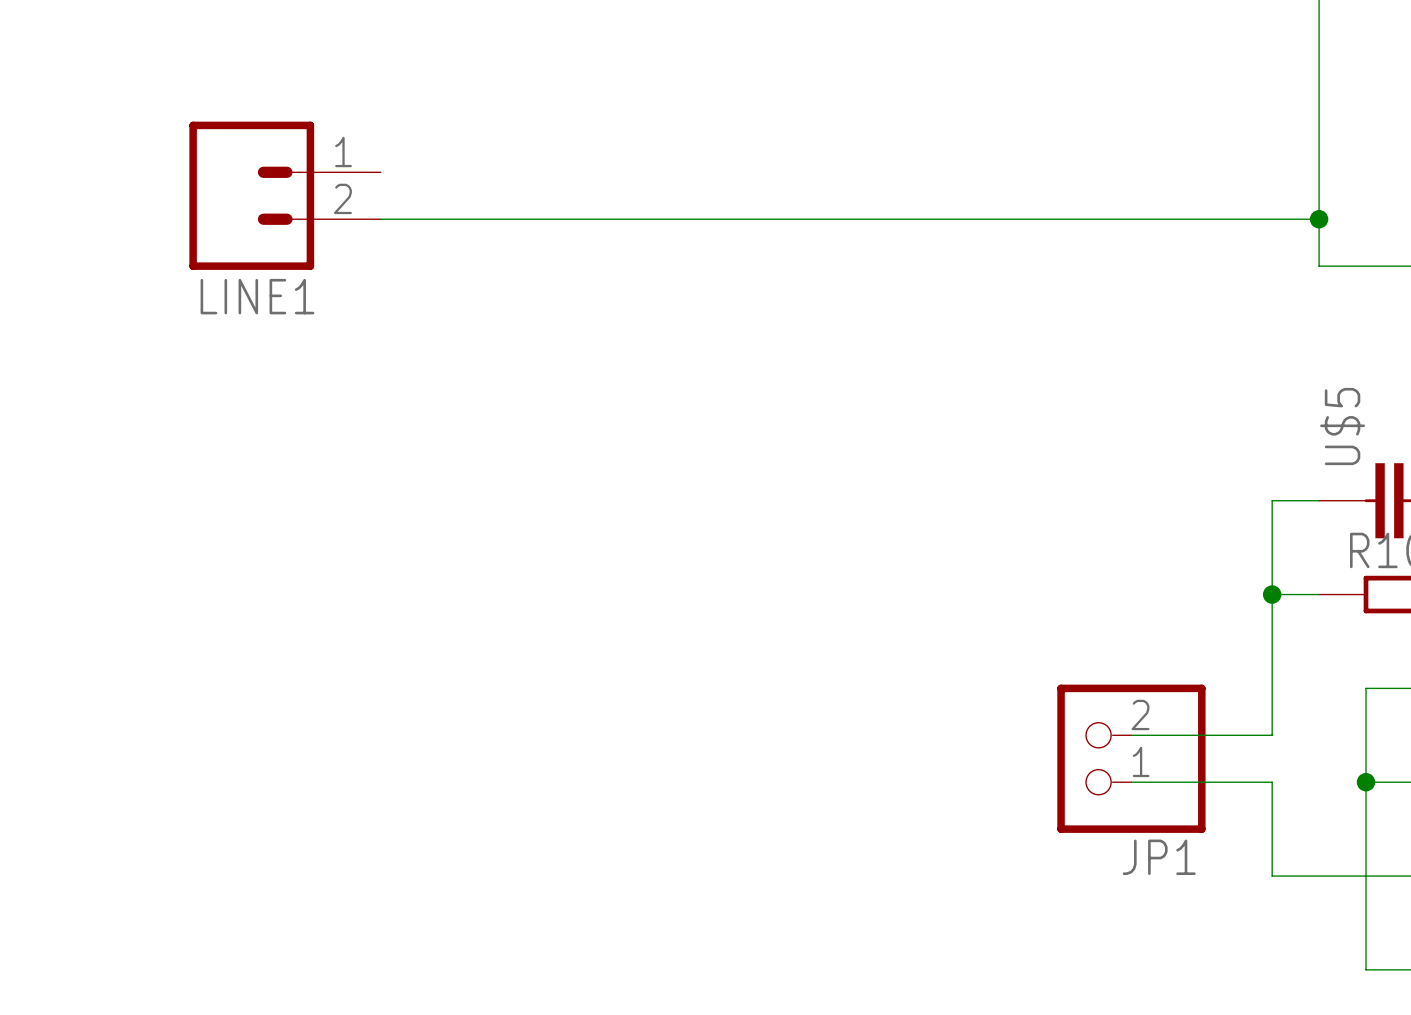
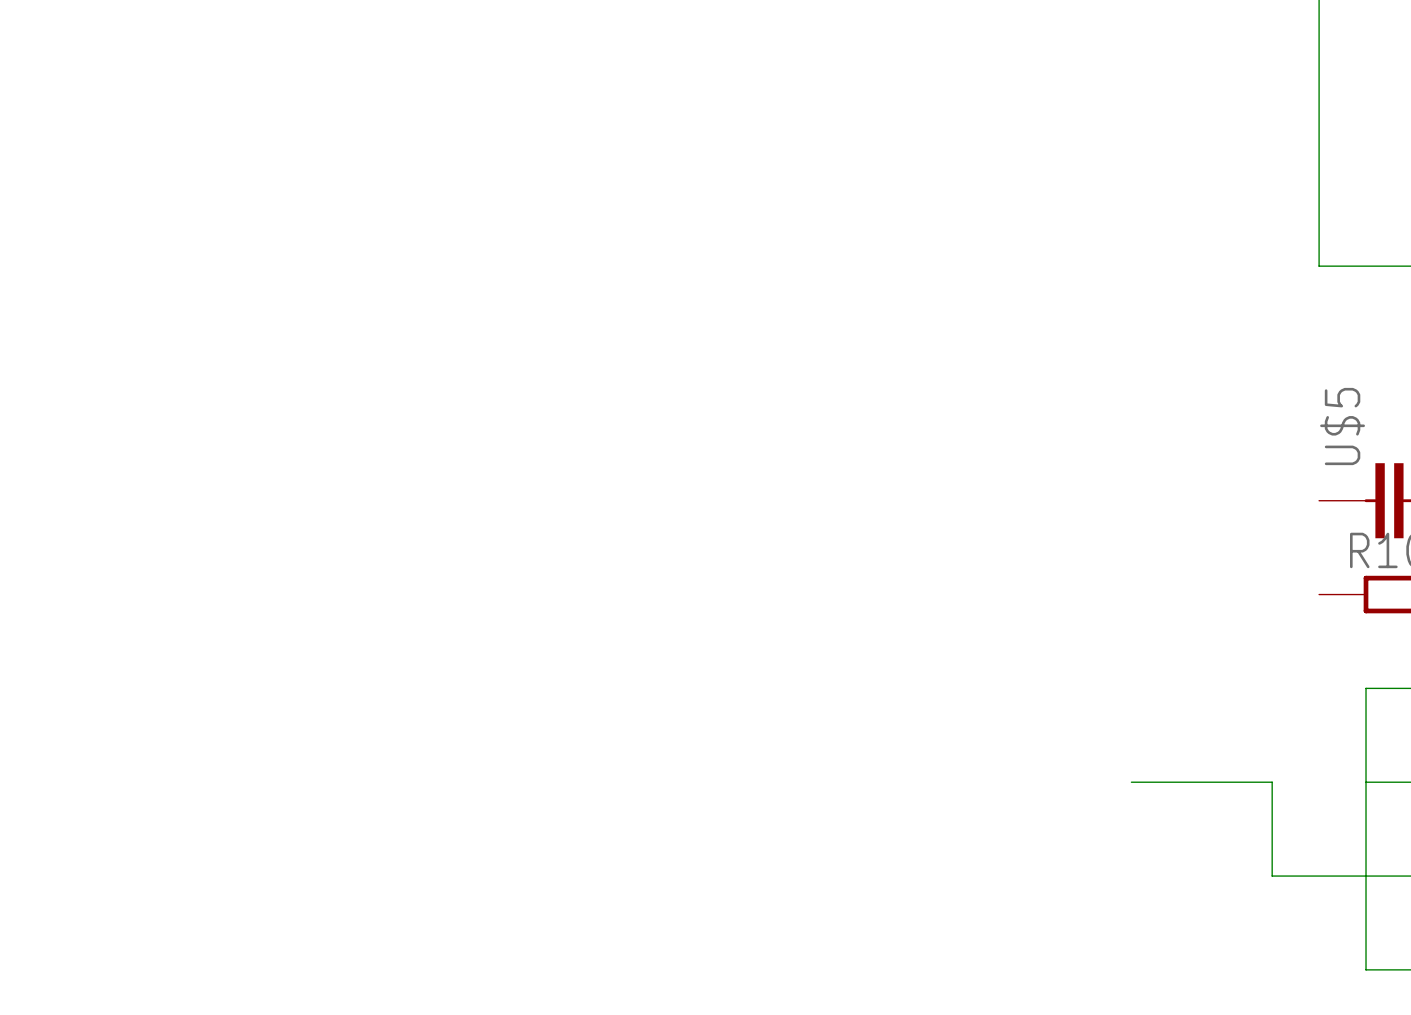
LINE1: (285, 195) -> none
wire: (380, 219) (1319, 219) -> none
junction: (1319, 219) -> none
wire: (1319, 500) (1272, 500) (1272, 735) (1131, 735) -> none
wire: (1272, 594) (1319, 594) -> none
junction: (1272, 594) -> none
JP1: (1131, 758) -> none
junction: (1366, 782) -> none

